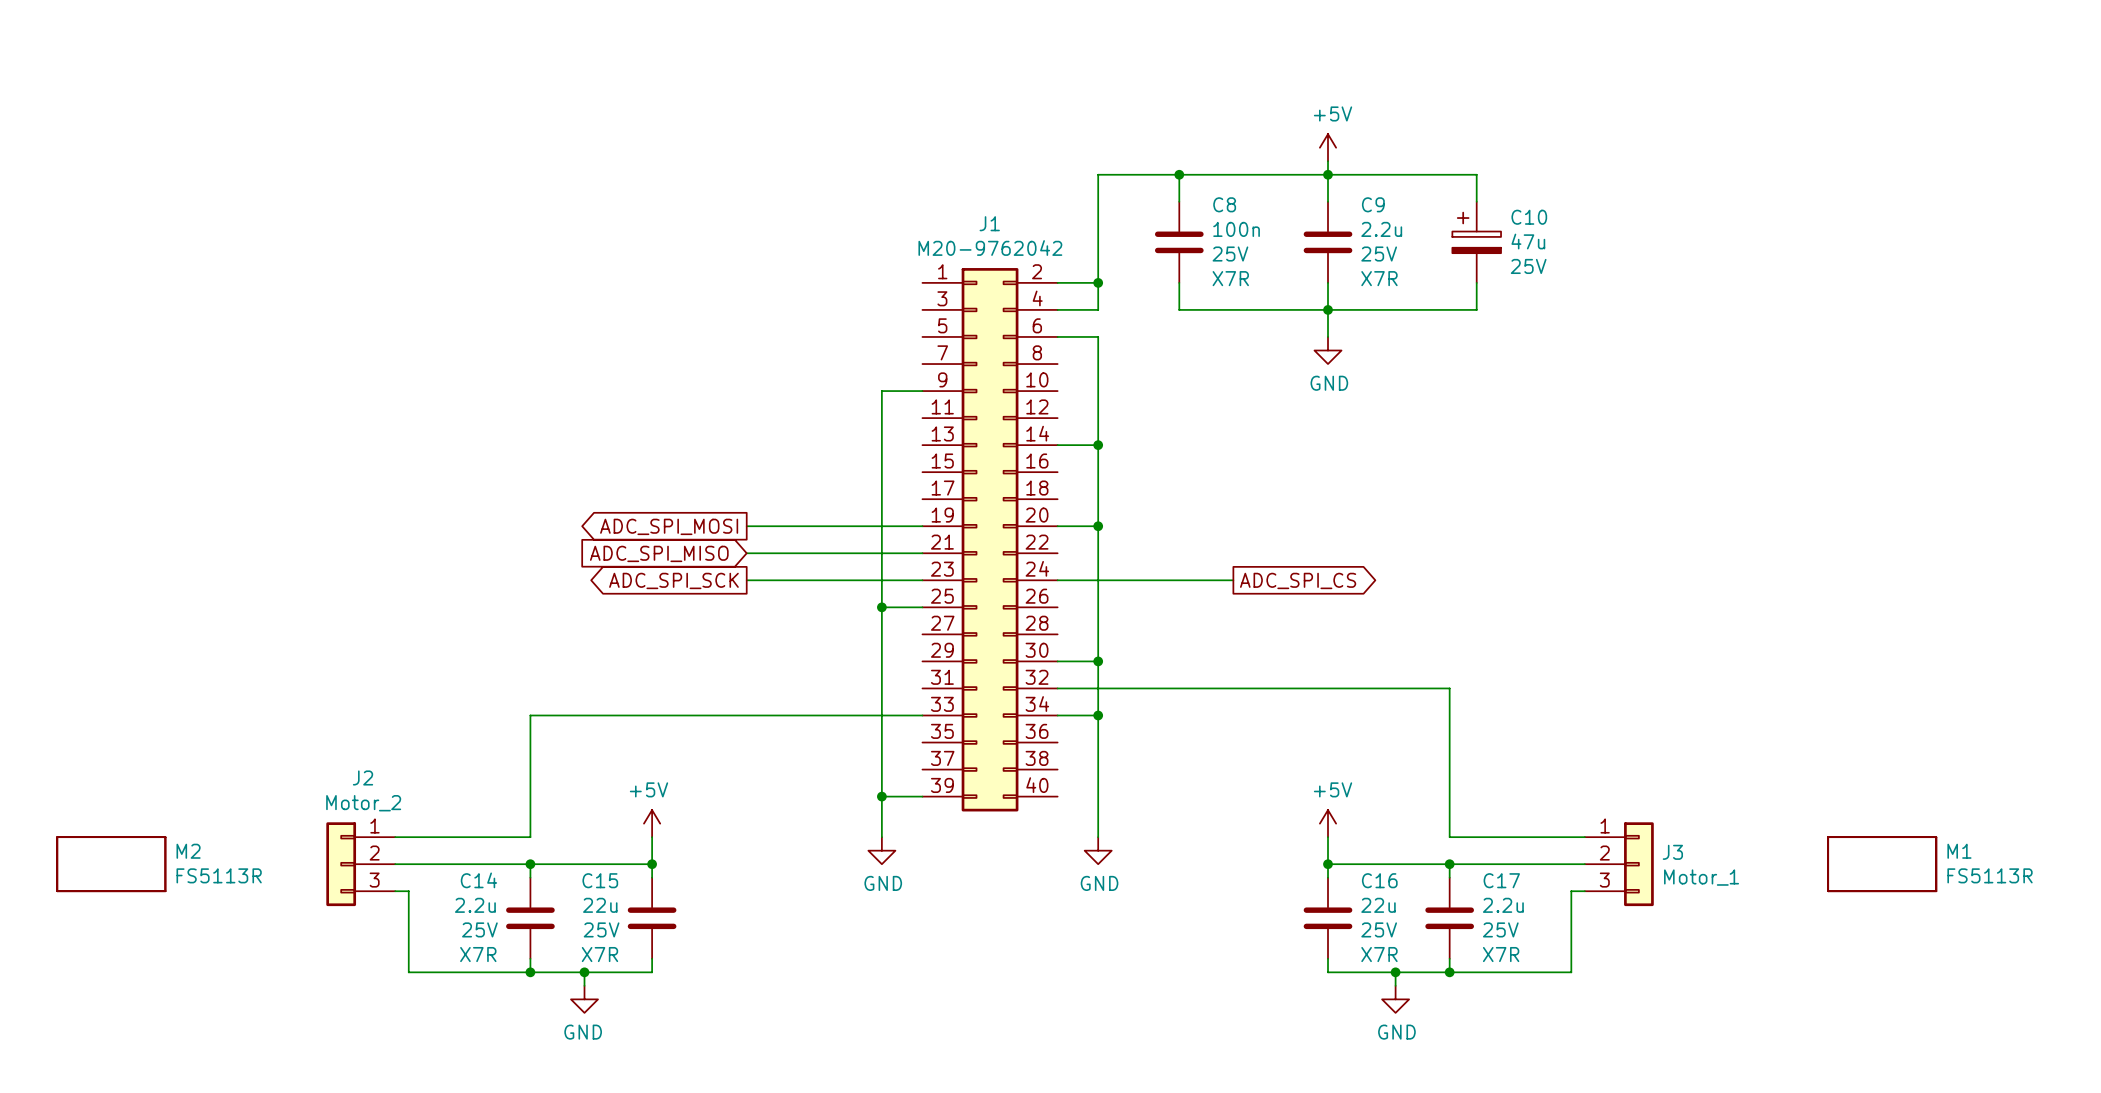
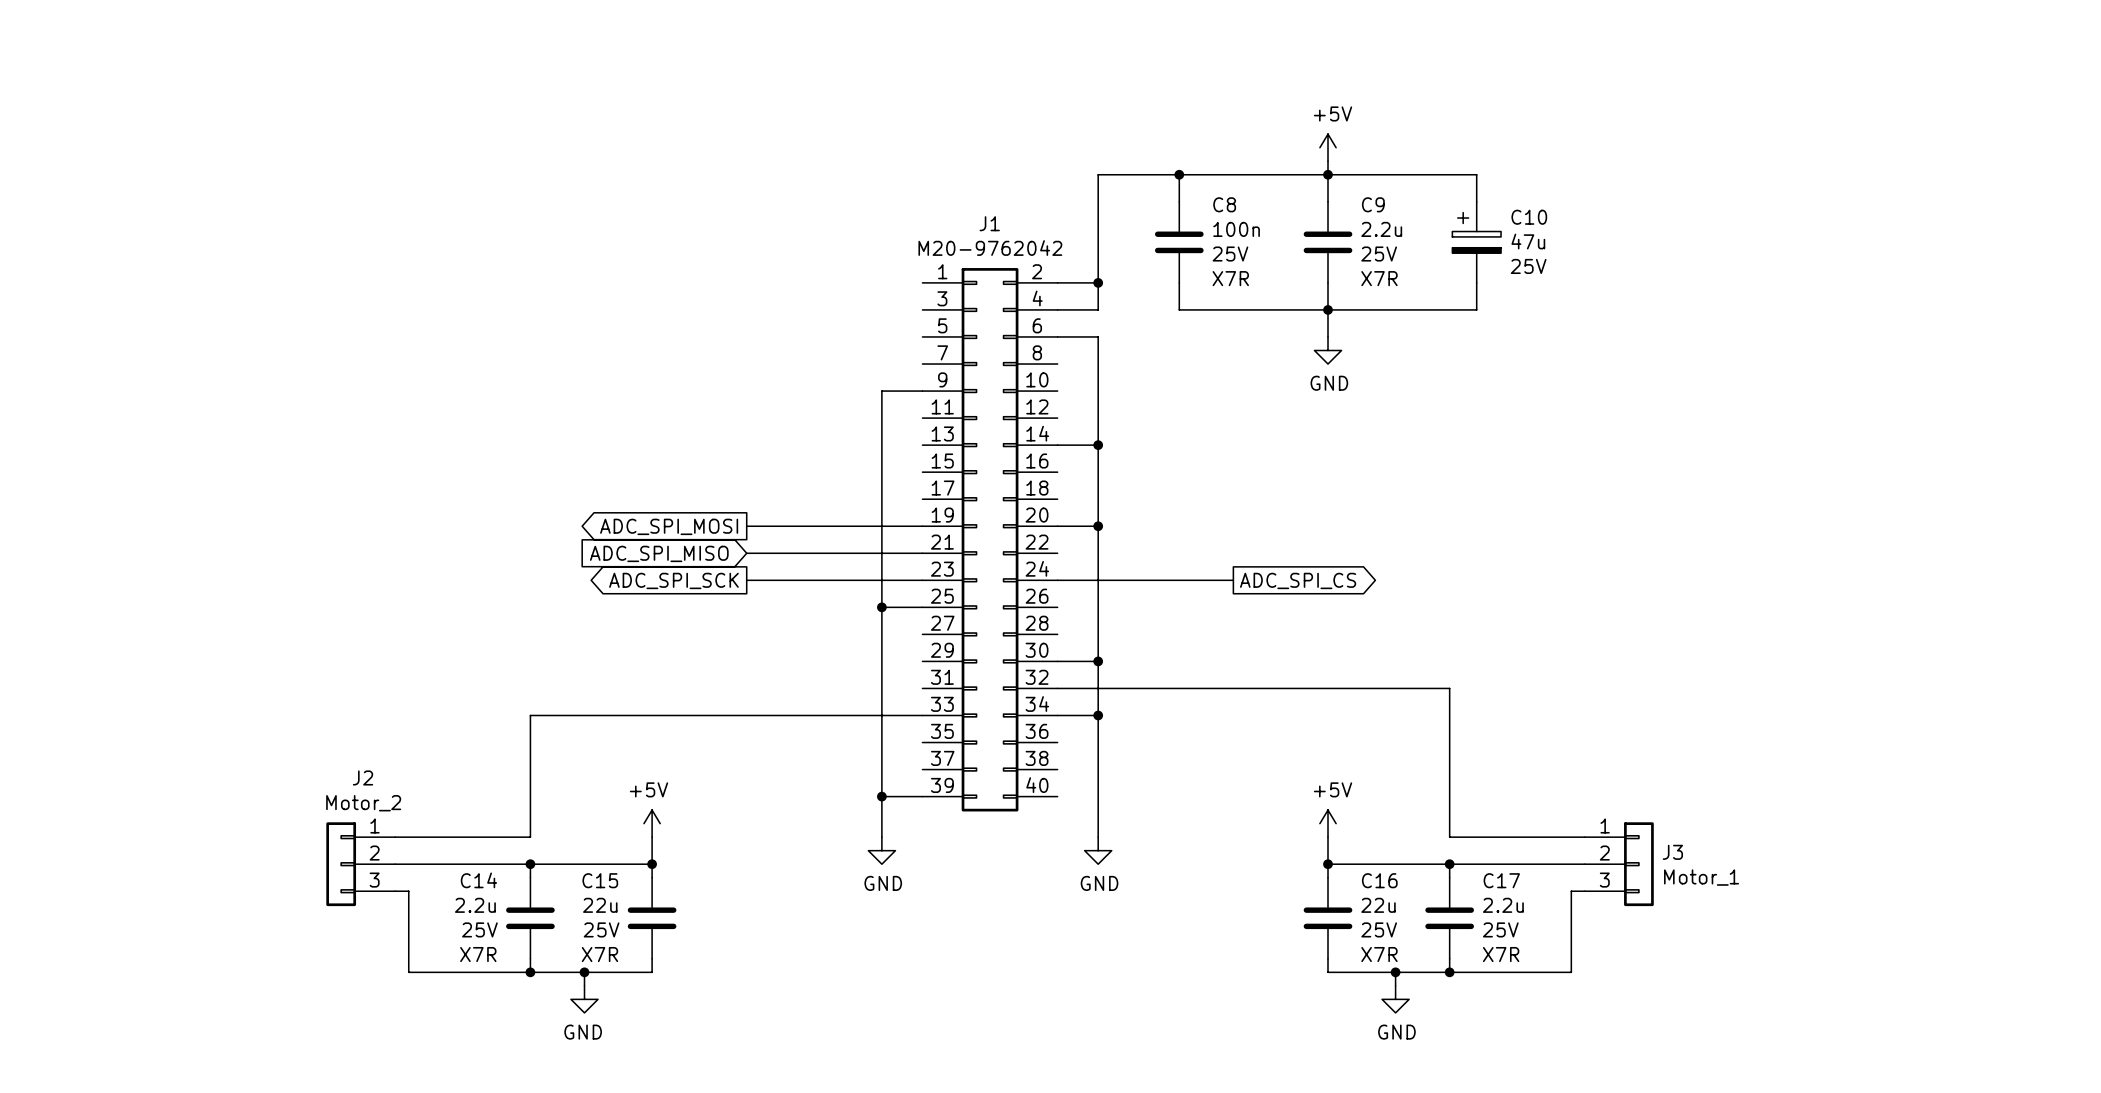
M2: FS5113R (111, 864) -> none
M1: FS5113R (1882, 864) -> none

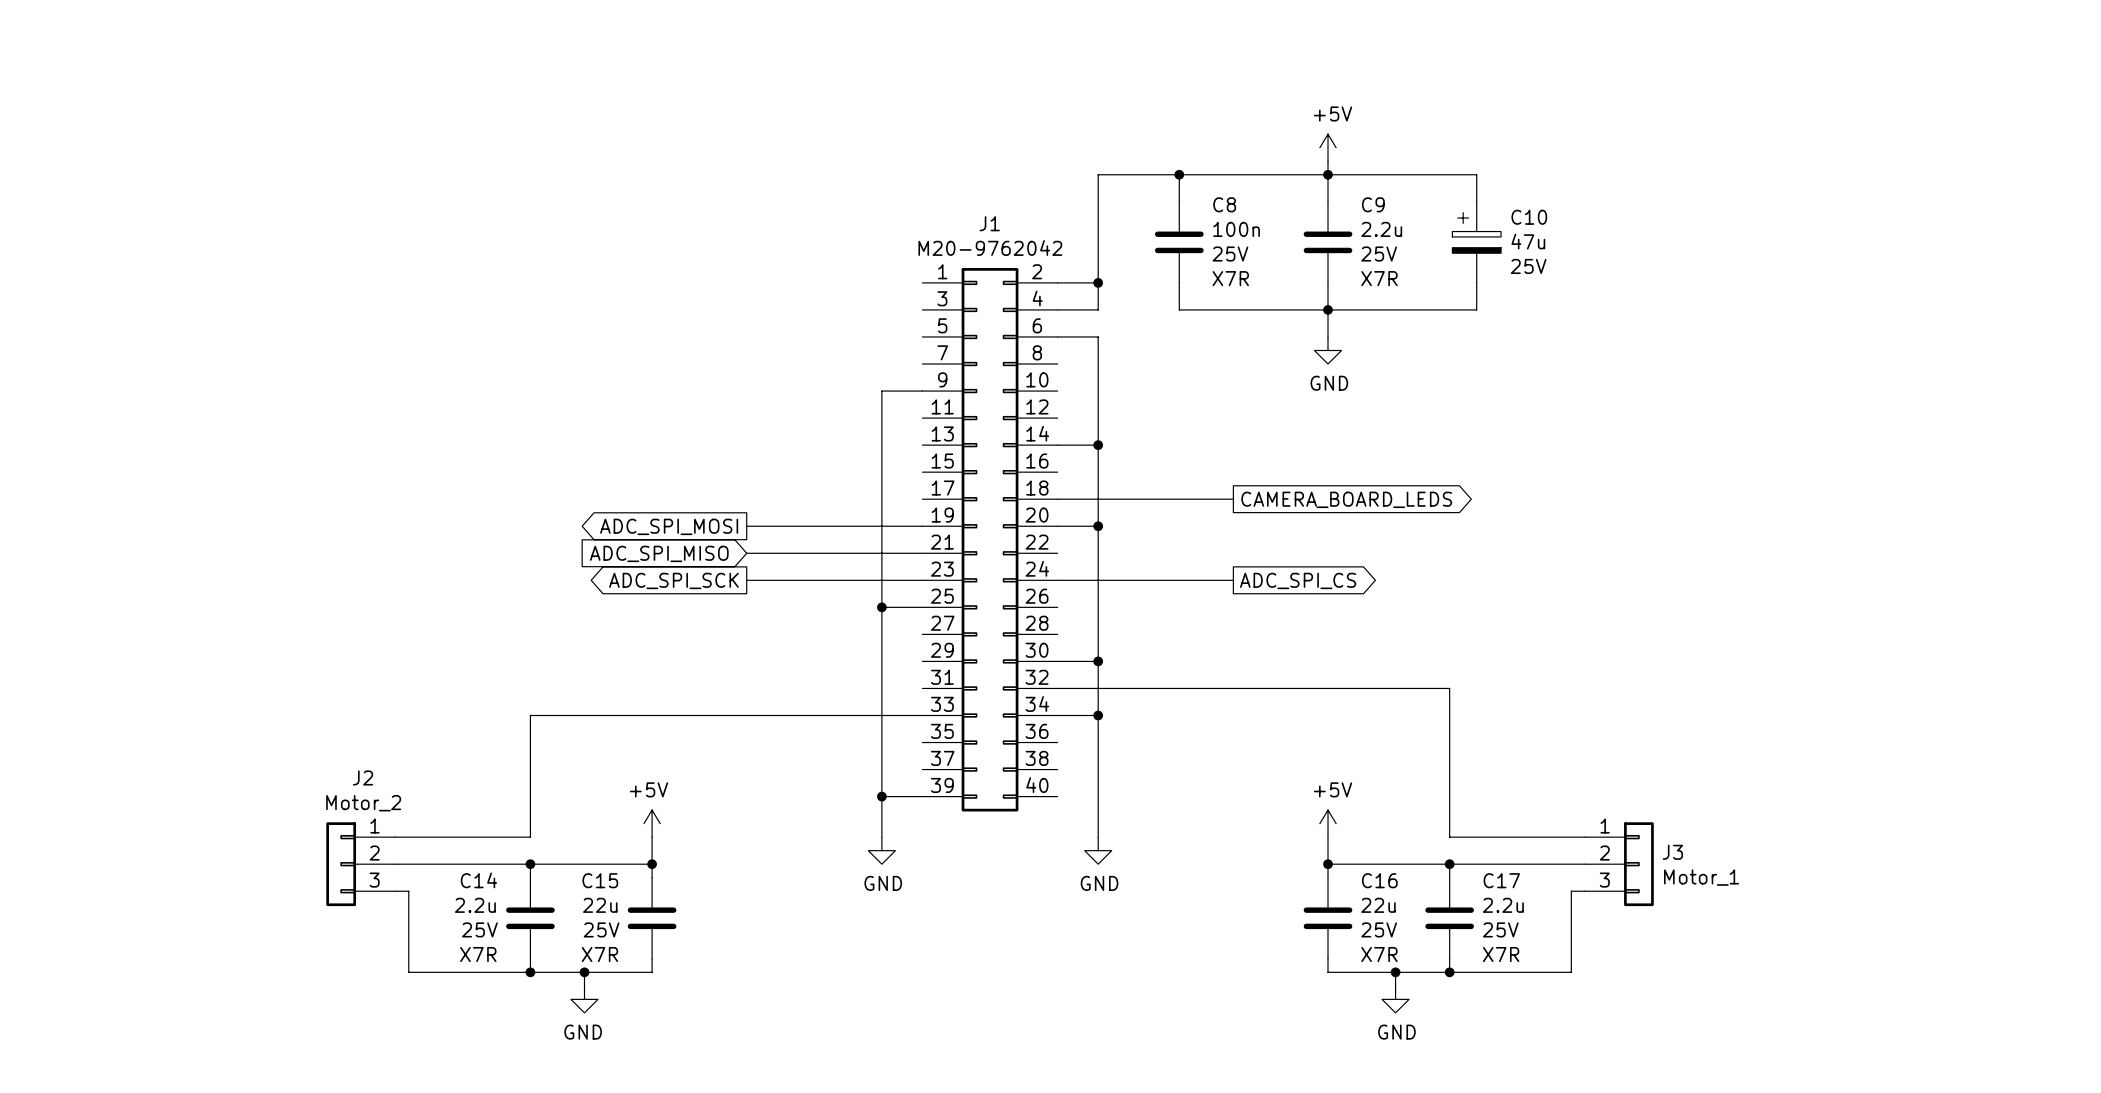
wire: none -> (1057, 499) (1233, 499)
global label: none -> CAMERA_BOARD_LEDS (1346, 499)

